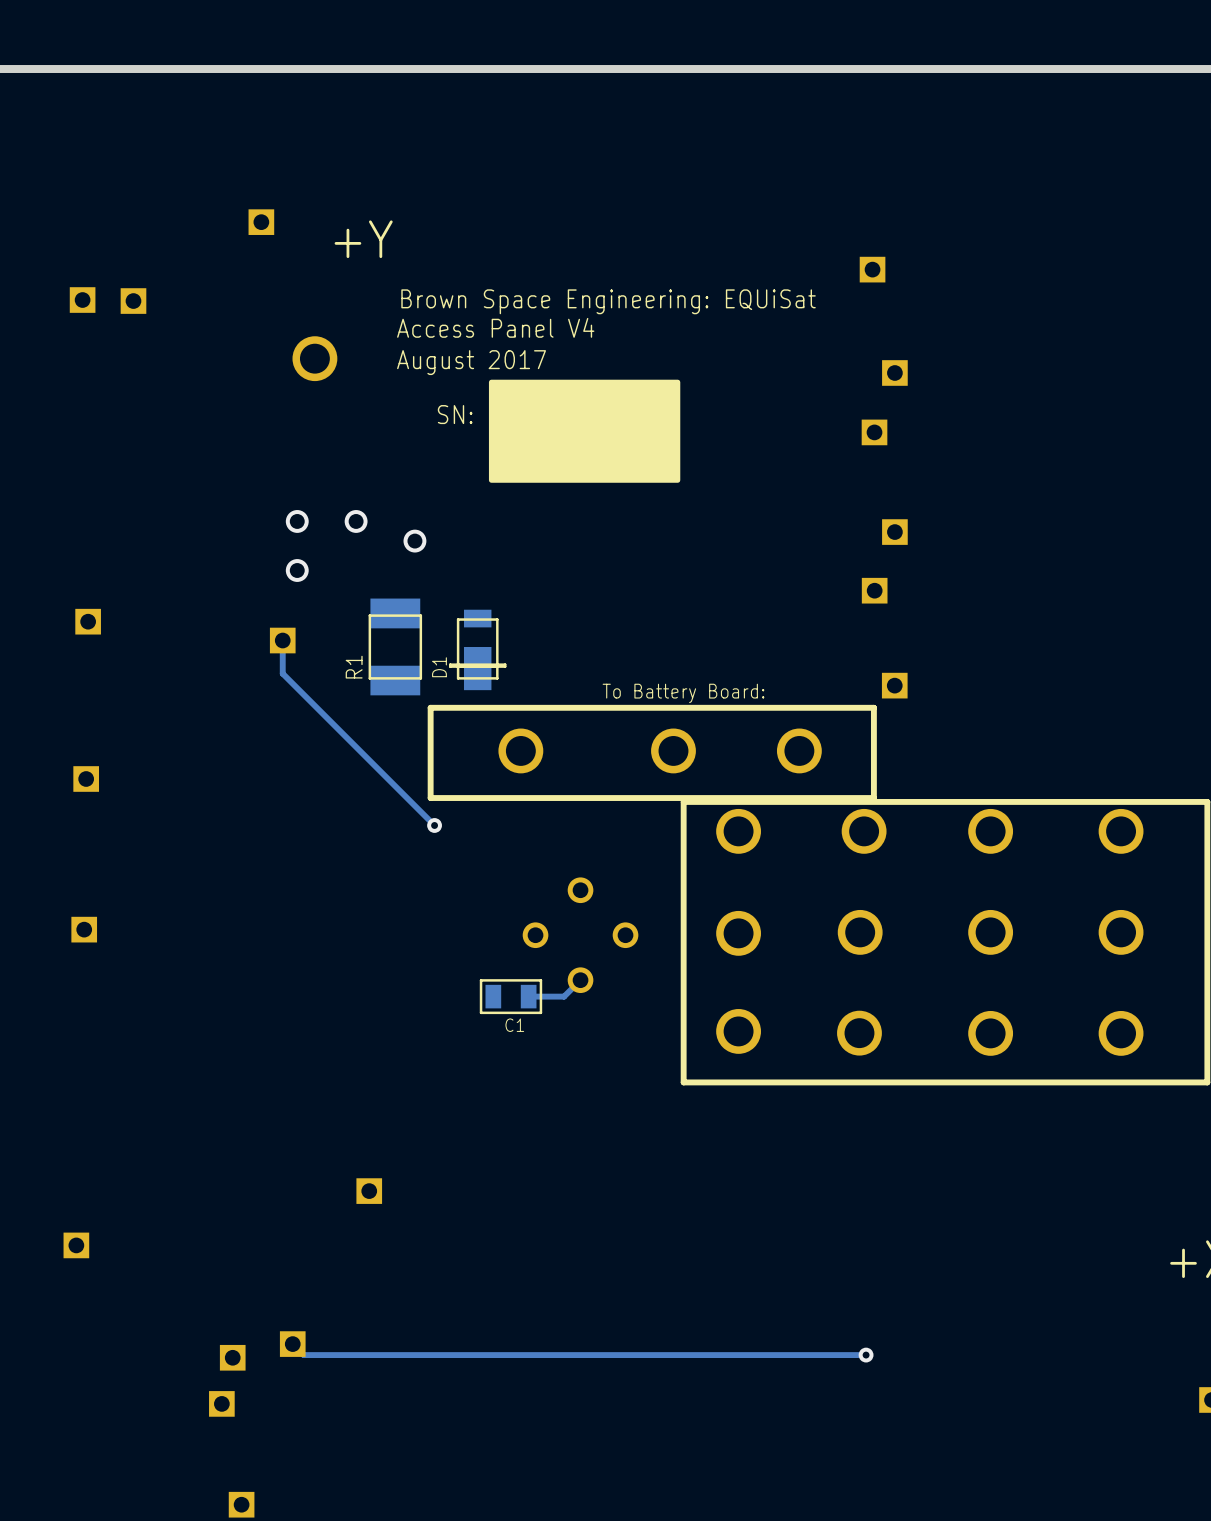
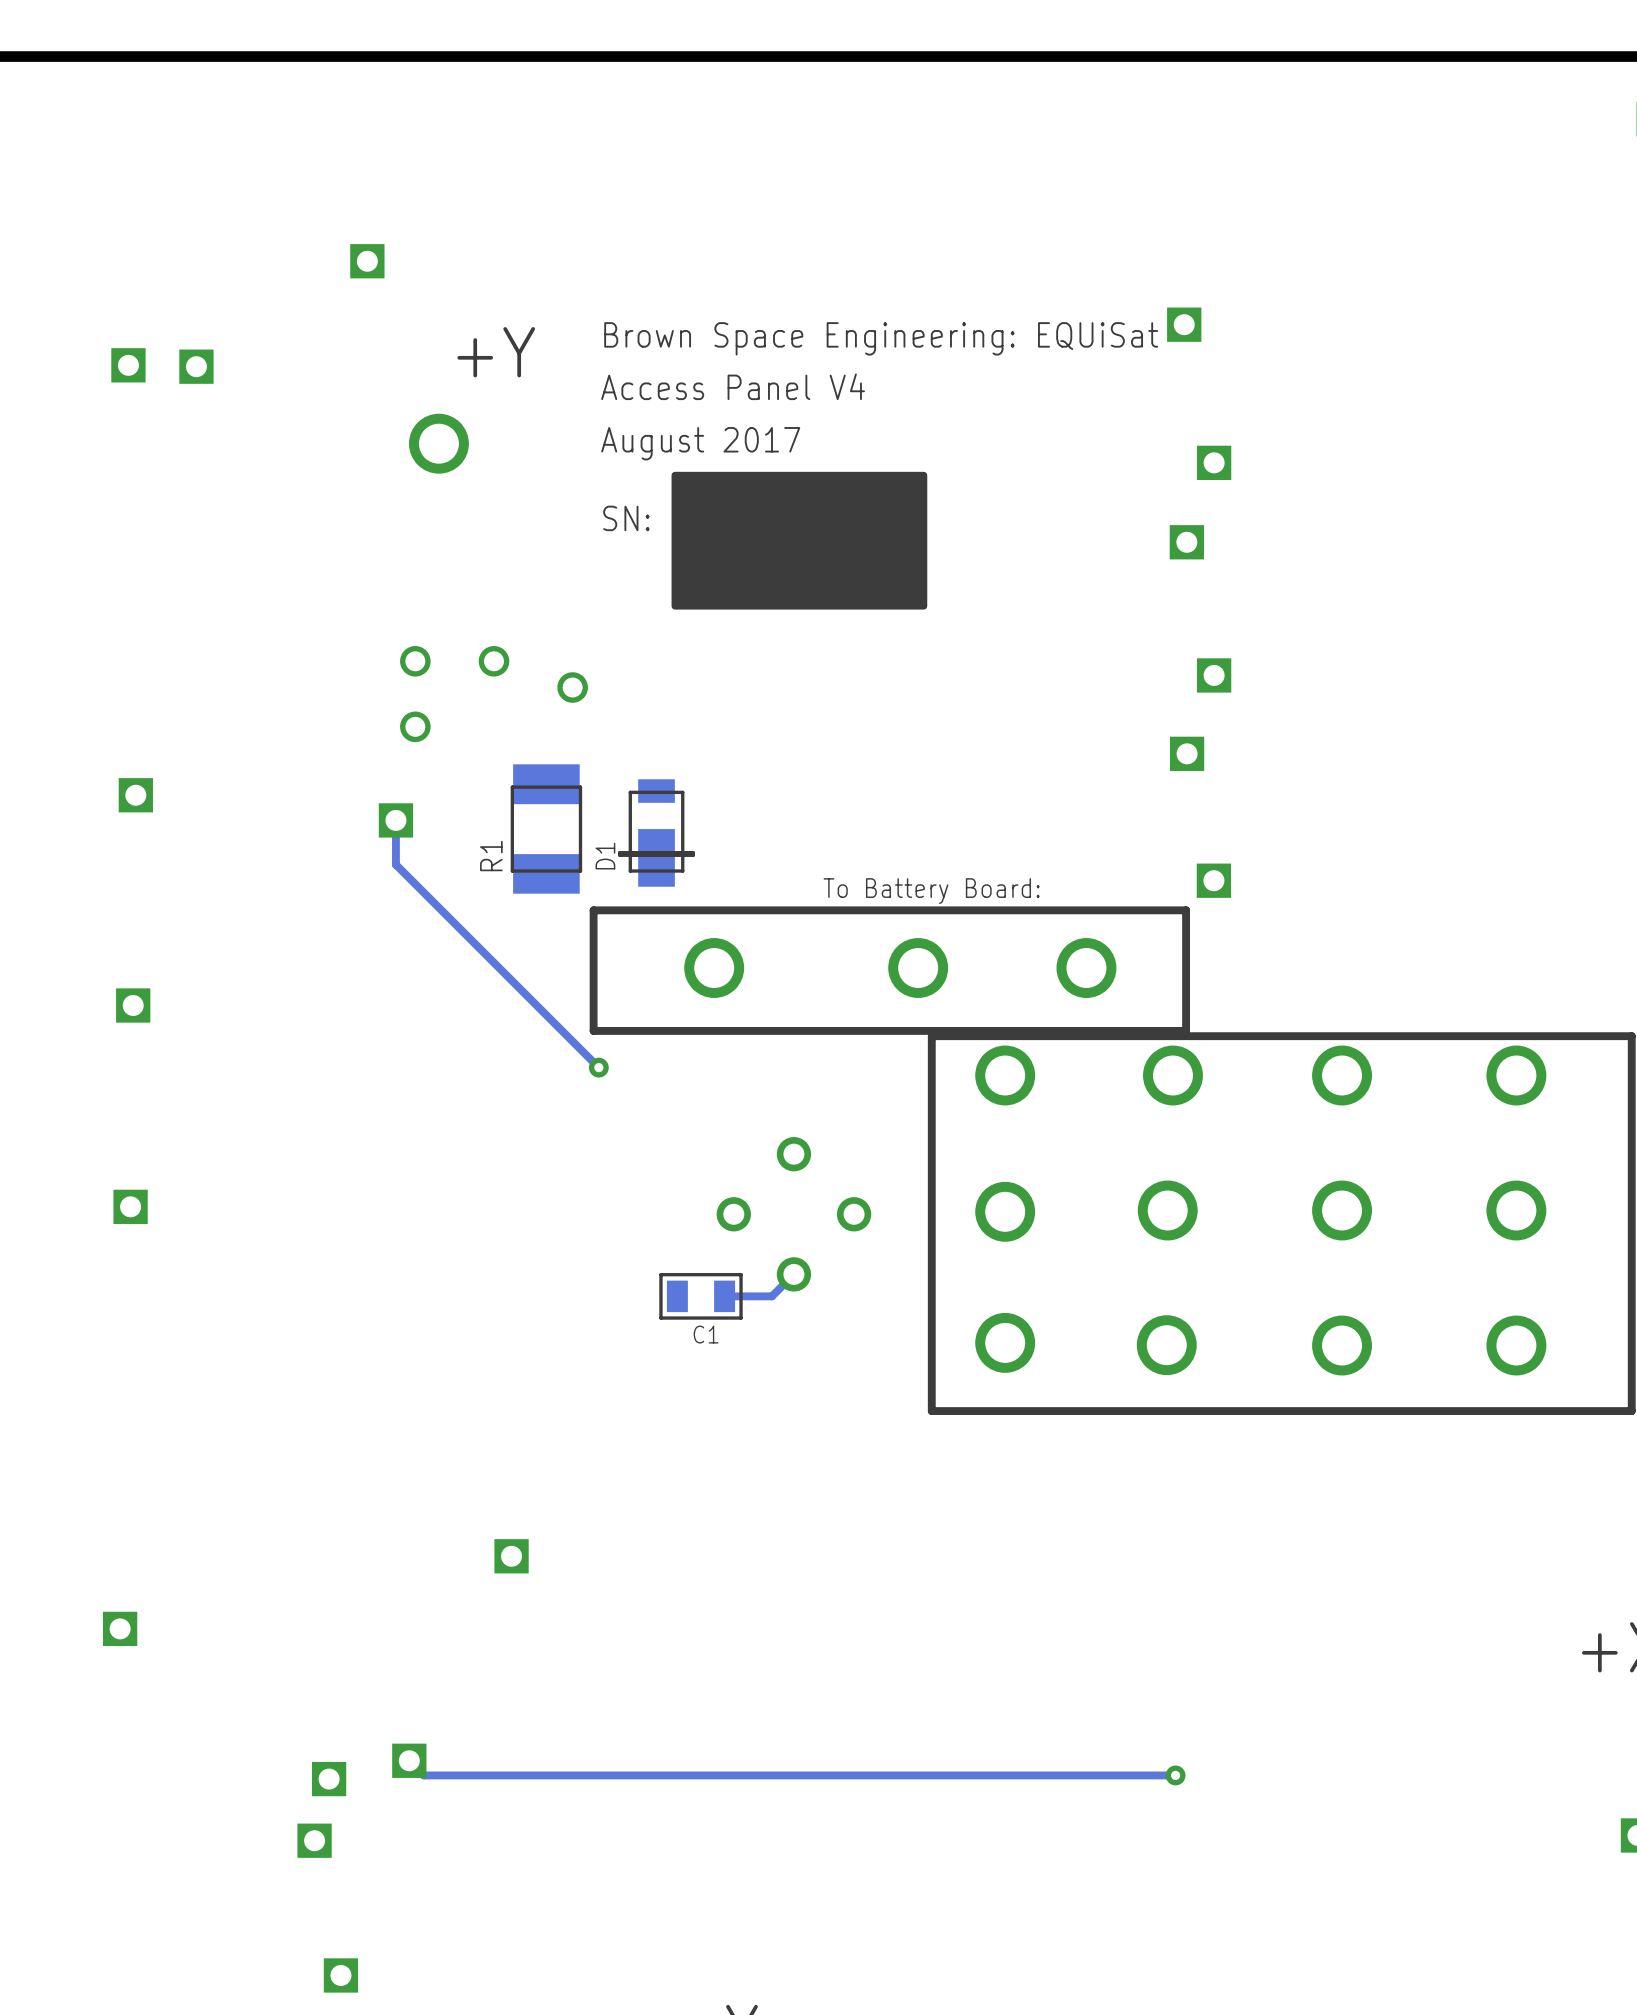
text position: +Y (363, 239) -> +Y (496, 352)
text position: Brown Space Engineering: EQUiSat (608, 301) -> Brown Space Engineering: EQUiSat (881, 338)
text position: Access Panel V4 (495, 327) -> Access Panel V4 (733, 386)
text position: August 2017 (471, 362) -> August 2017 (700, 443)

